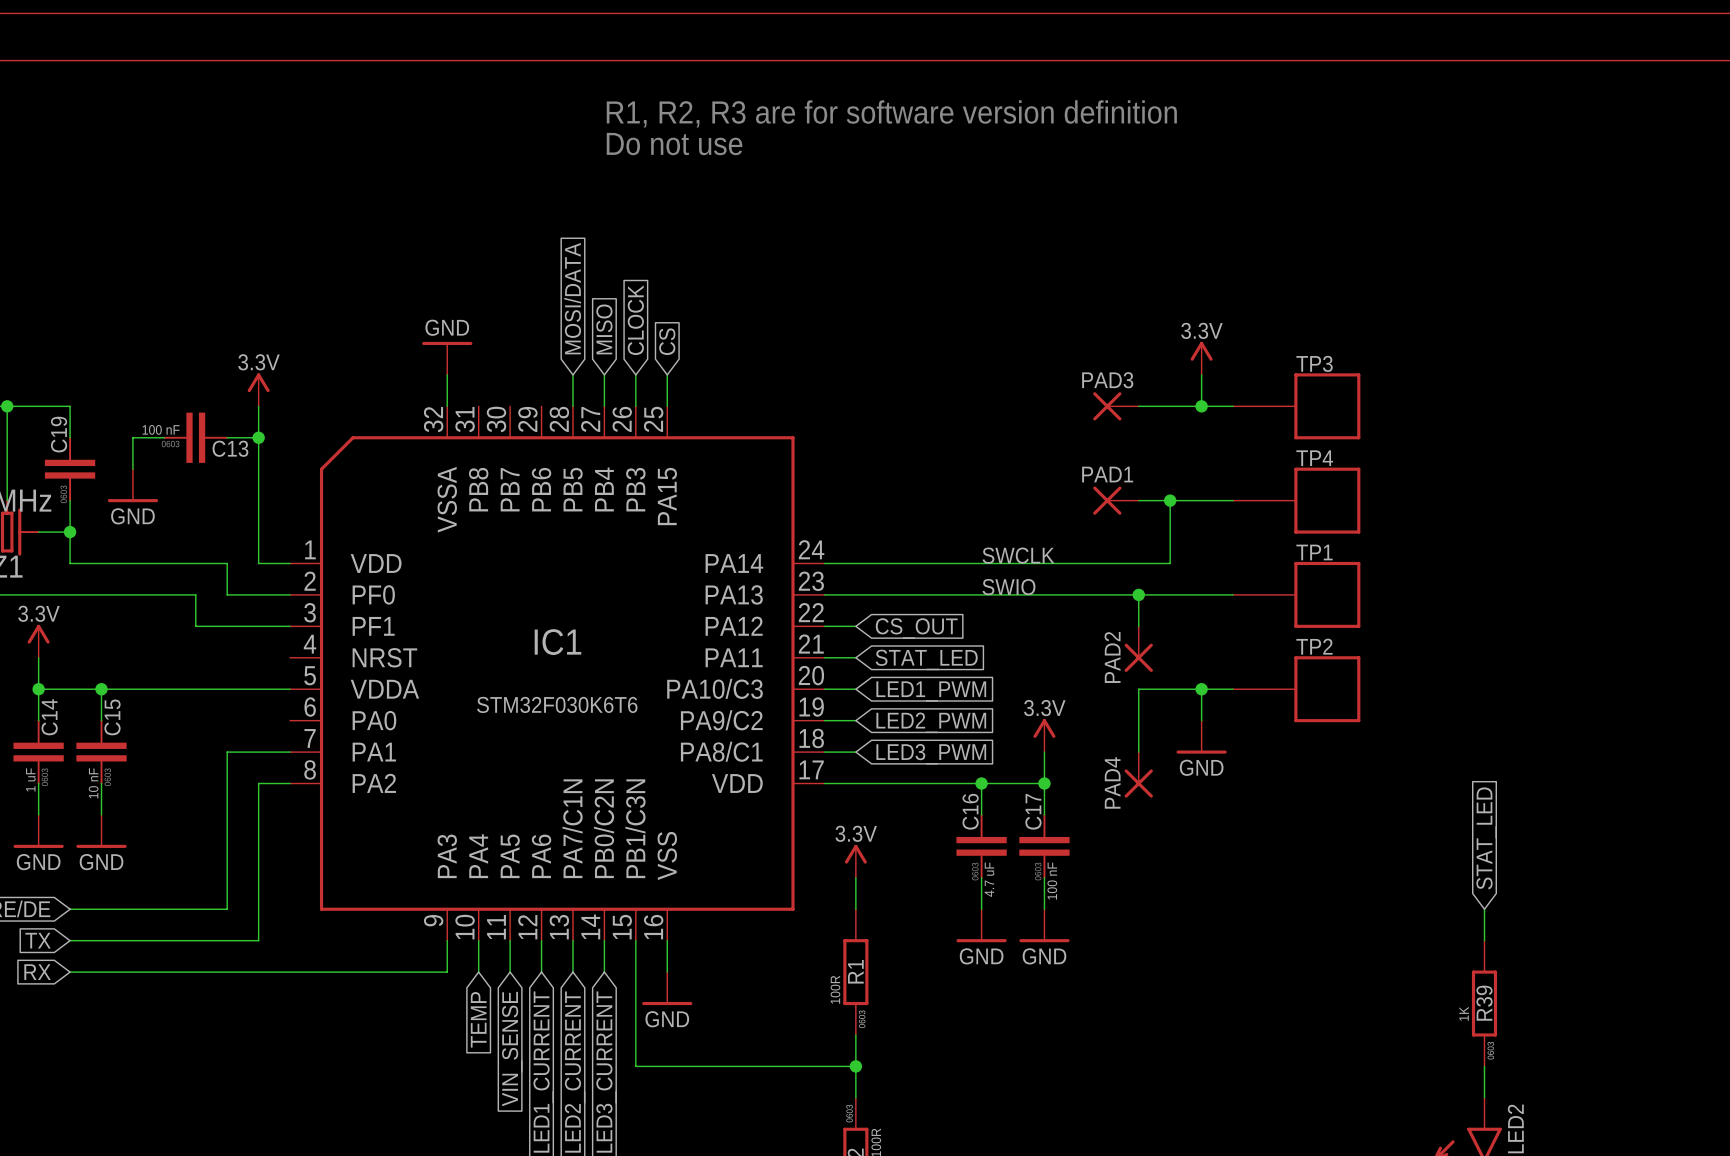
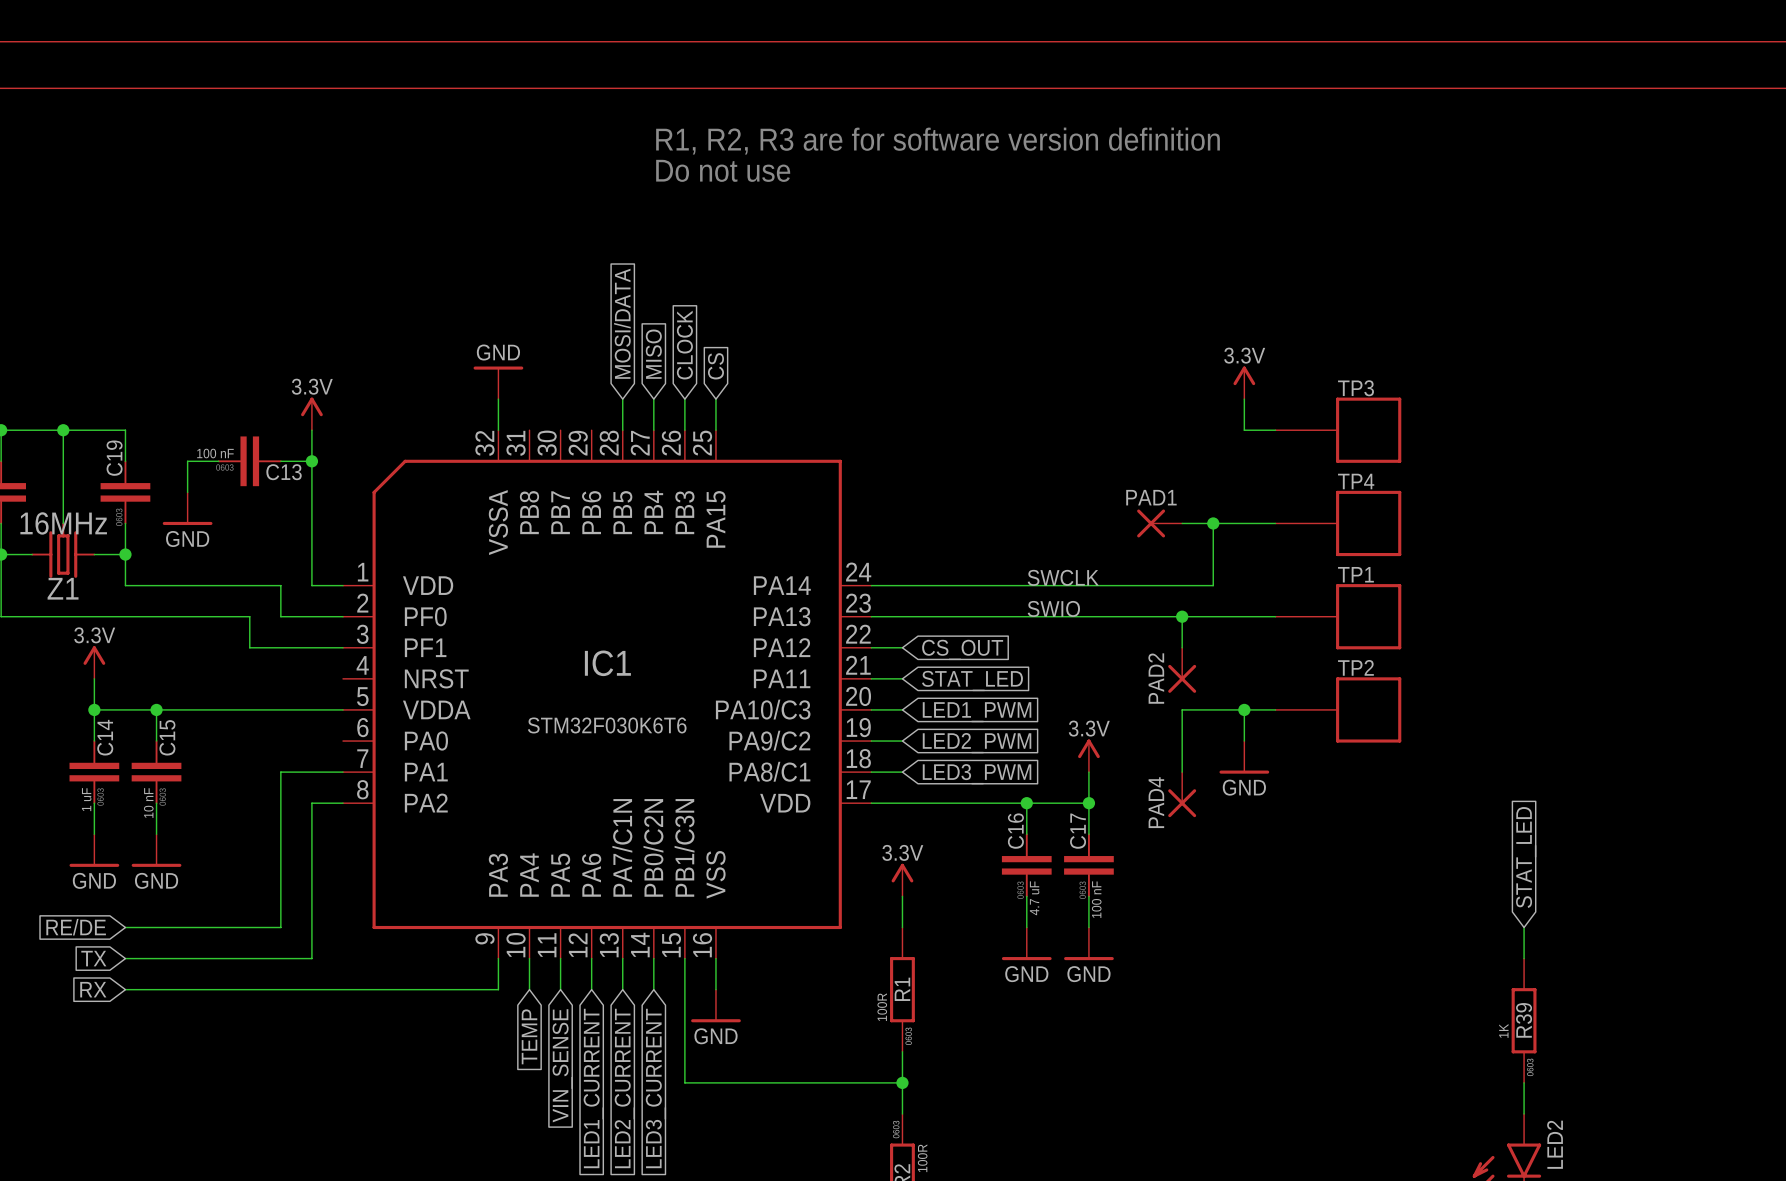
PAD3: (1115, 406) -> none
wire: (1138, 406) (1201, 406) -> none
junction: (1201, 406) -> none

